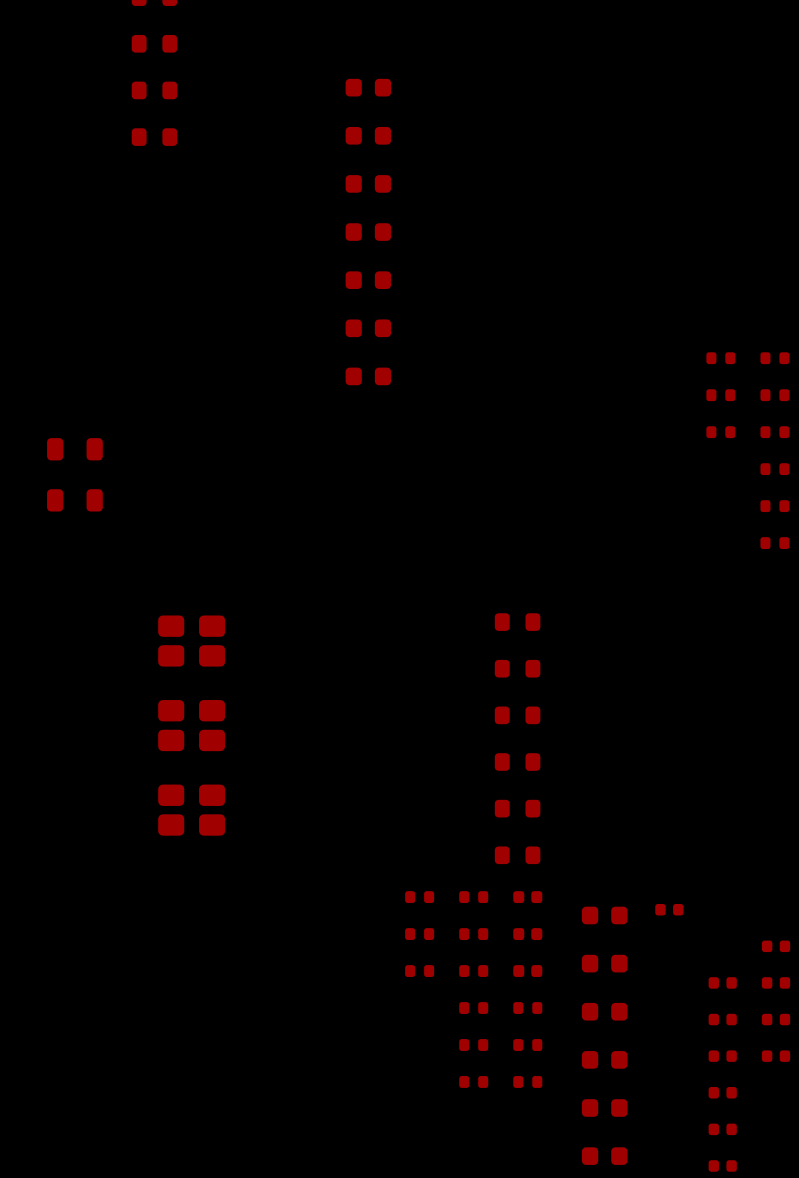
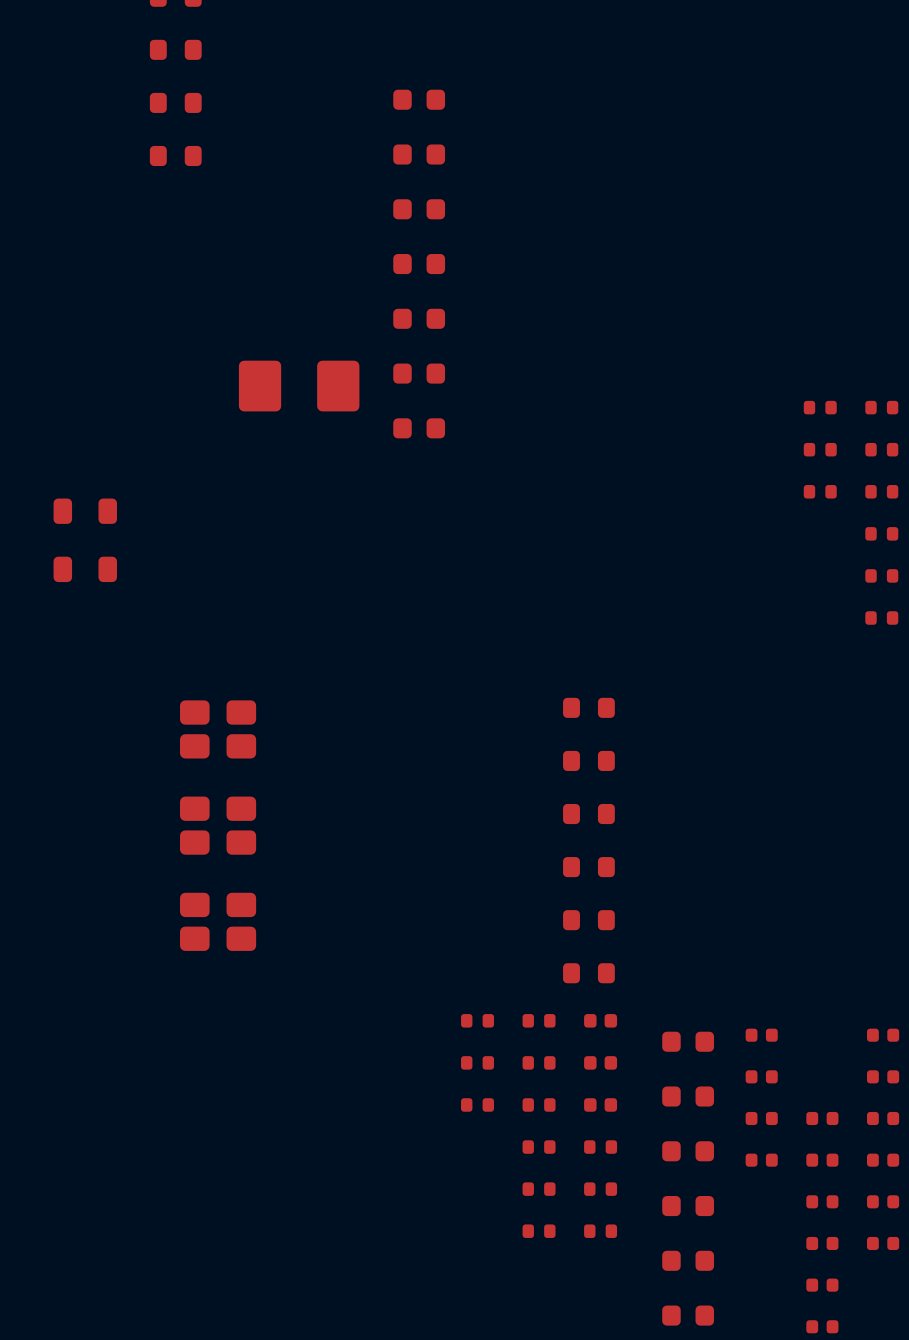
part: none -> (299, 386)
part: none -> (883, 1035)
part: none -> (761, 1076)
part: none -> (761, 1118)
part: none -> (761, 1160)
part: none -> (883, 1243)

